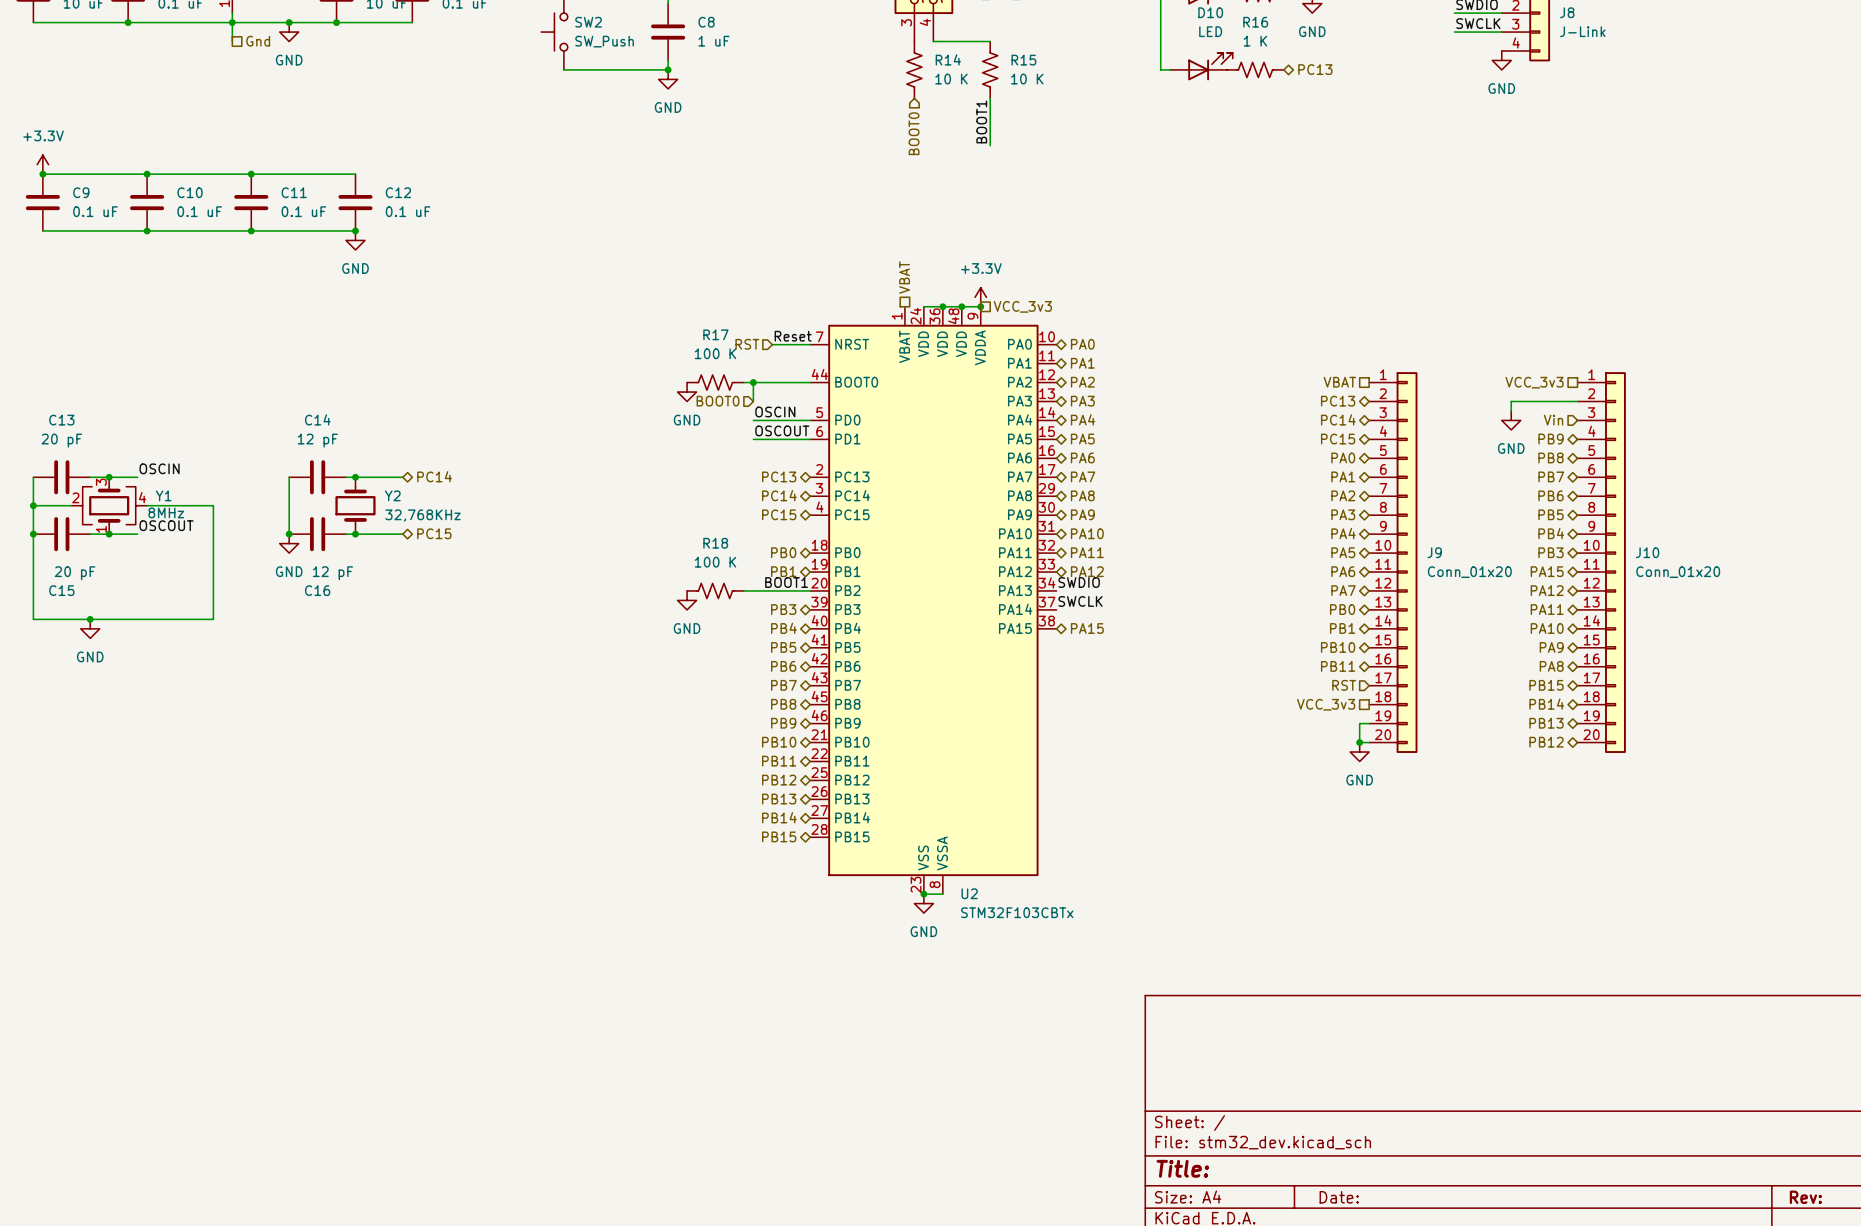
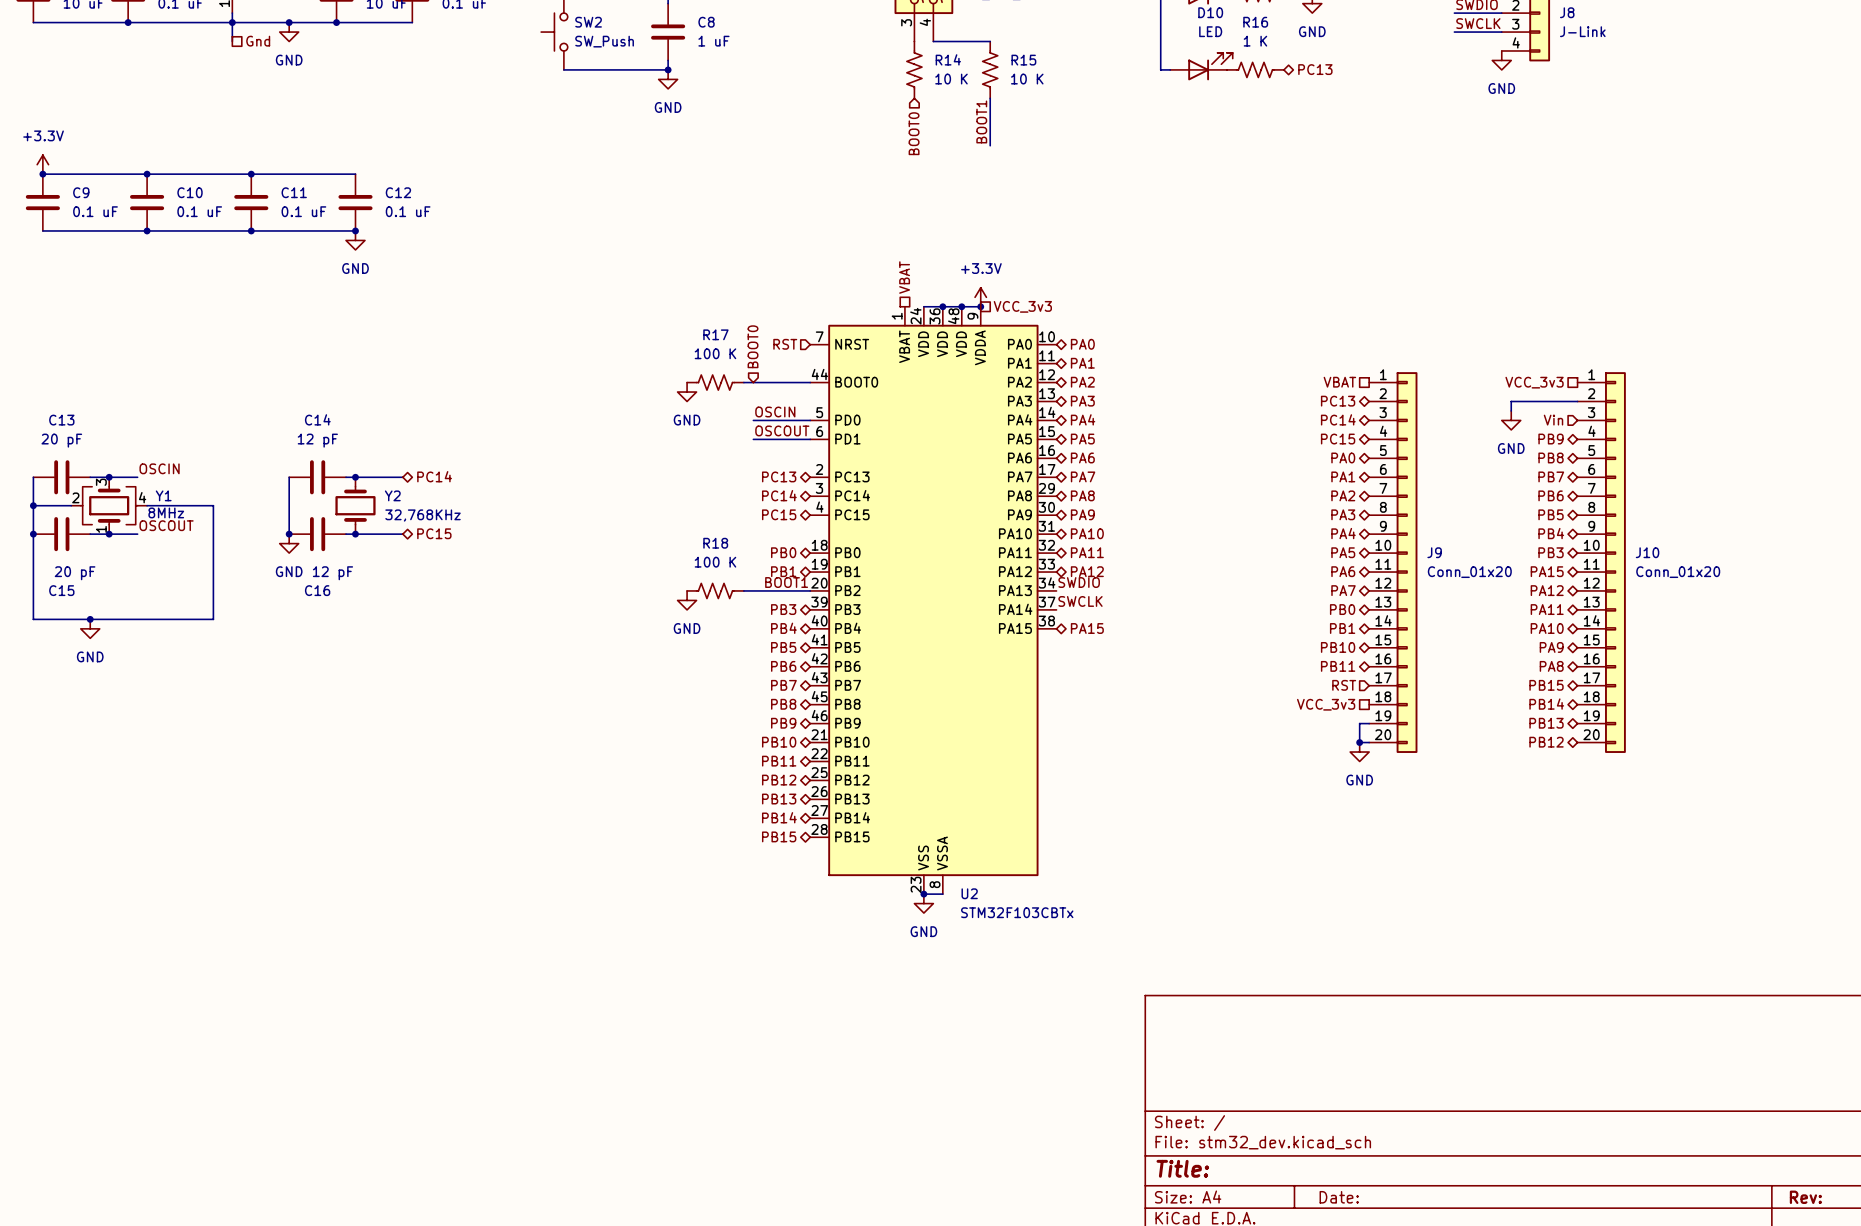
label: Reset (793, 336) -> none
hierarchical label position: RST (747, 344) -> RST (785, 344)
wire: (772, 344) (810, 344) -> none
wire: (753, 382) (753, 401) -> none
junction: (753, 382) -> none
hierarchical label rotation: 0° (718, 401) -> 90° clockwise (753, 346)
hierarchical label position: BOOT0 (718, 401) -> BOOT0 (753, 346)

